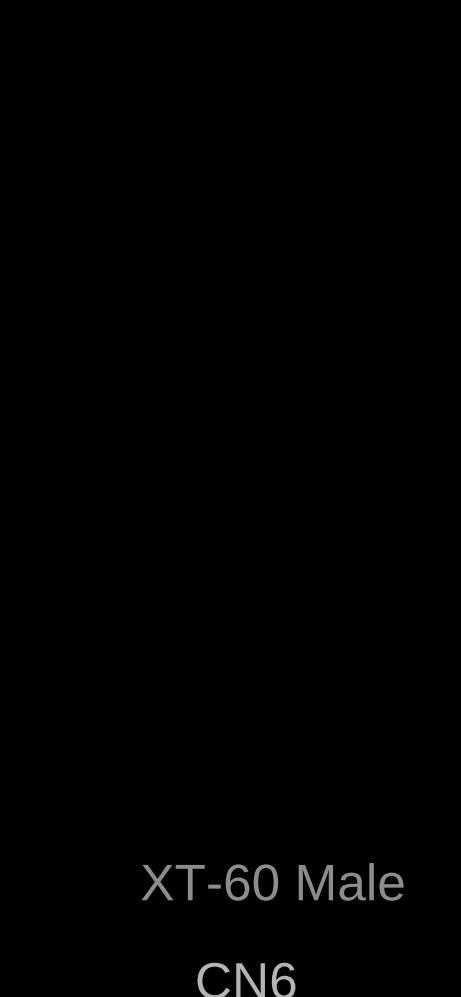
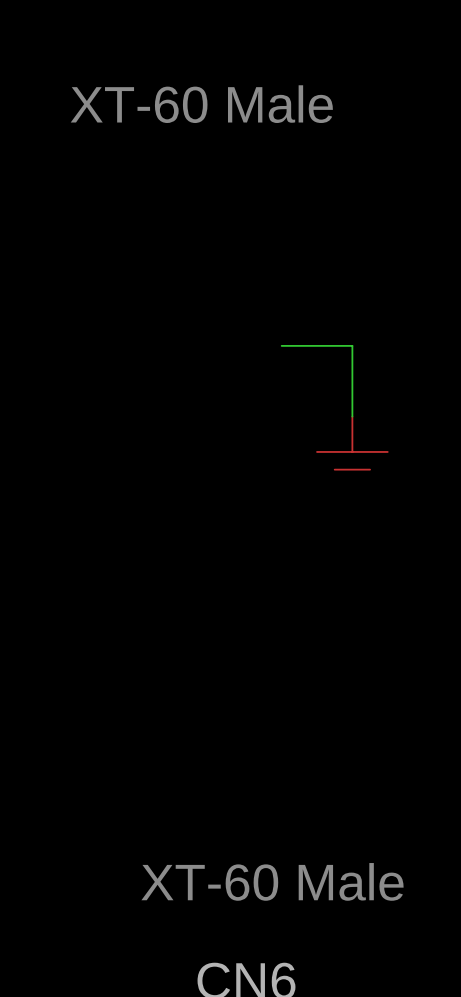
text: none -> XT-60 Male (201, 104)
wire: none -> (281, 345) (352, 345) (352, 416)
power symbol: none -> (352, 451)

